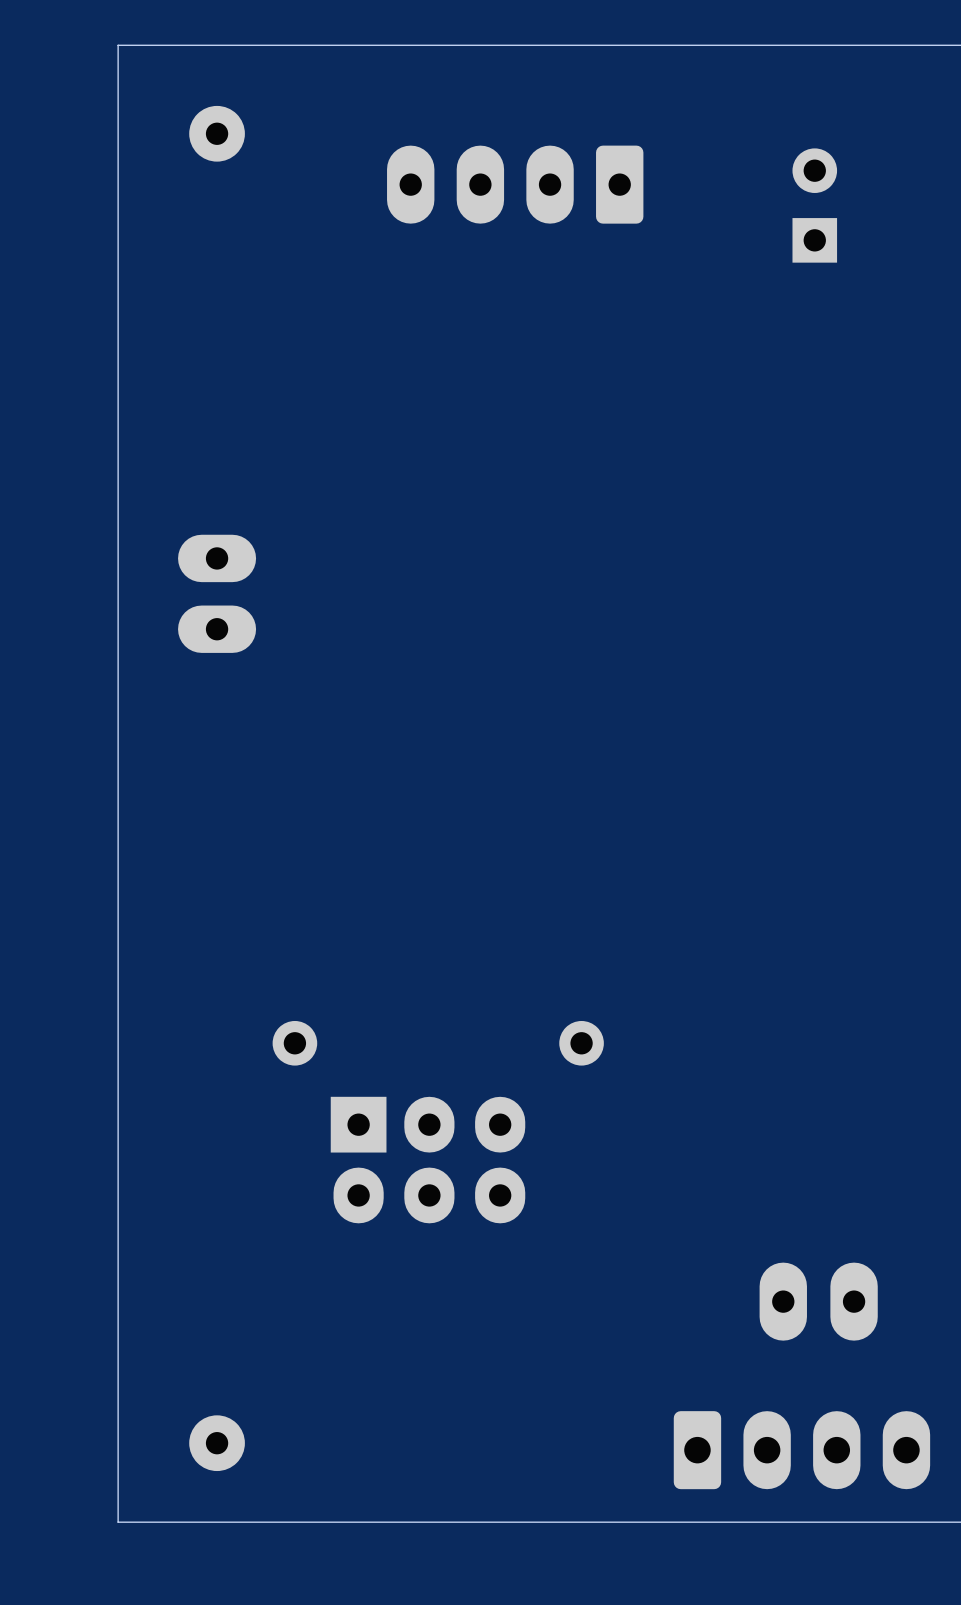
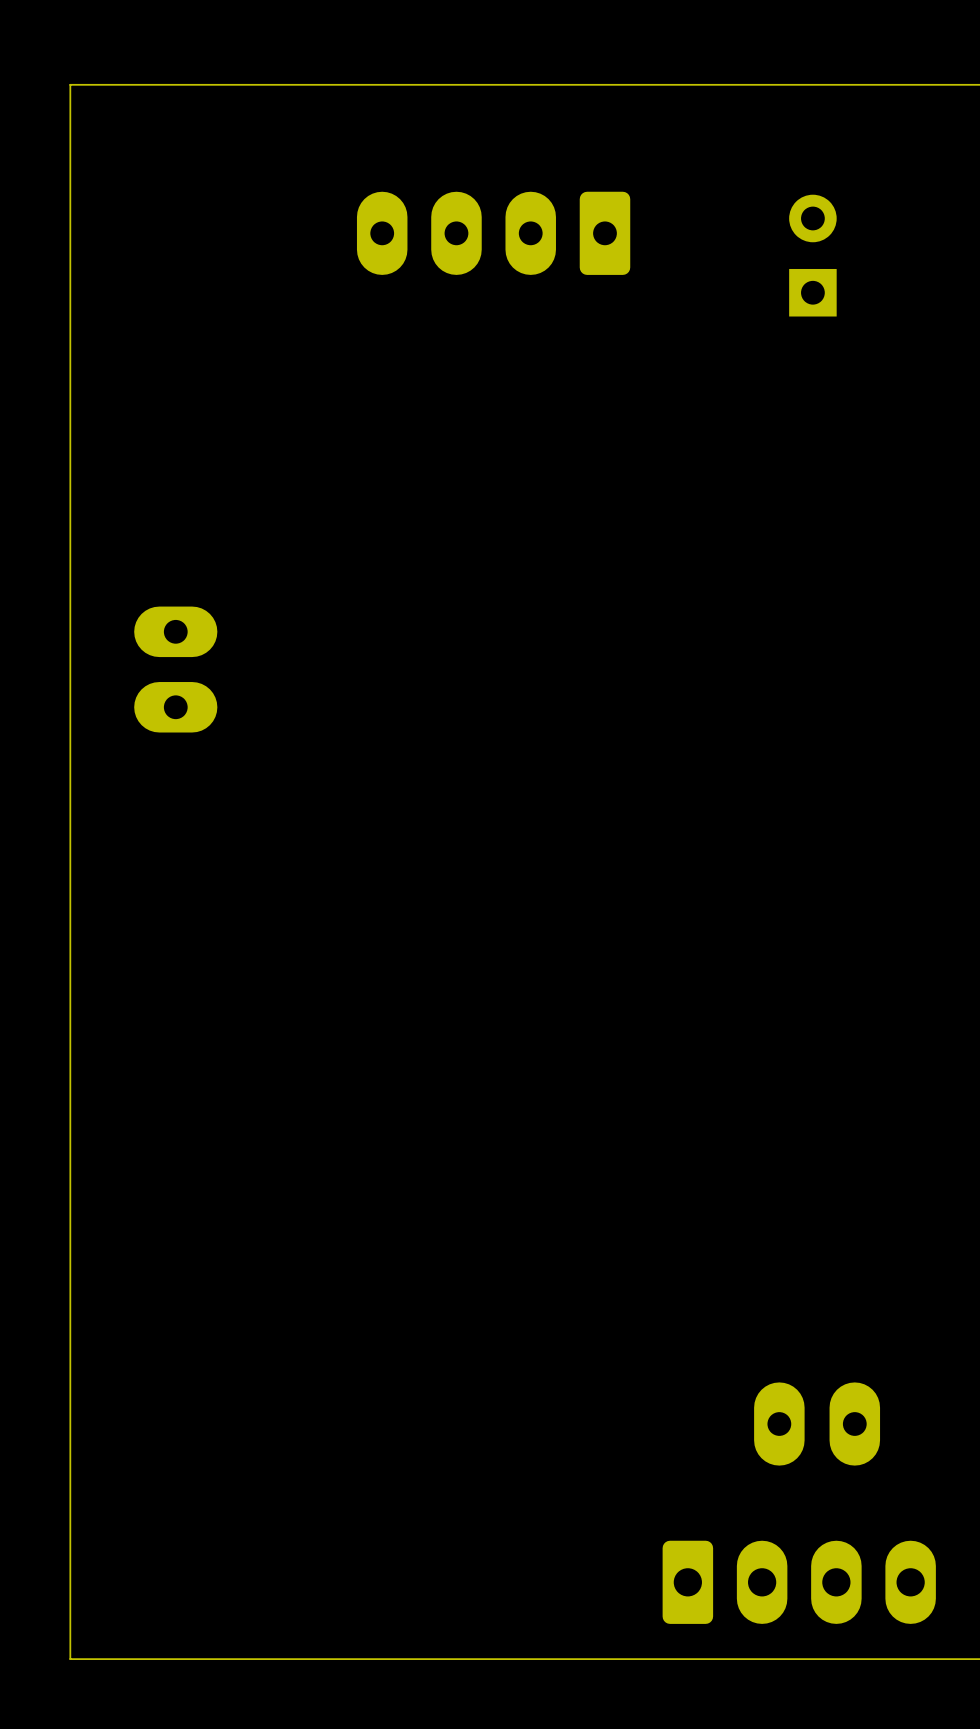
part: (217, 133) -> none
part: (294, 1043) -> none
part: (581, 1043) -> none
part: (427, 1160) -> none
part: (217, 1443) -> none

